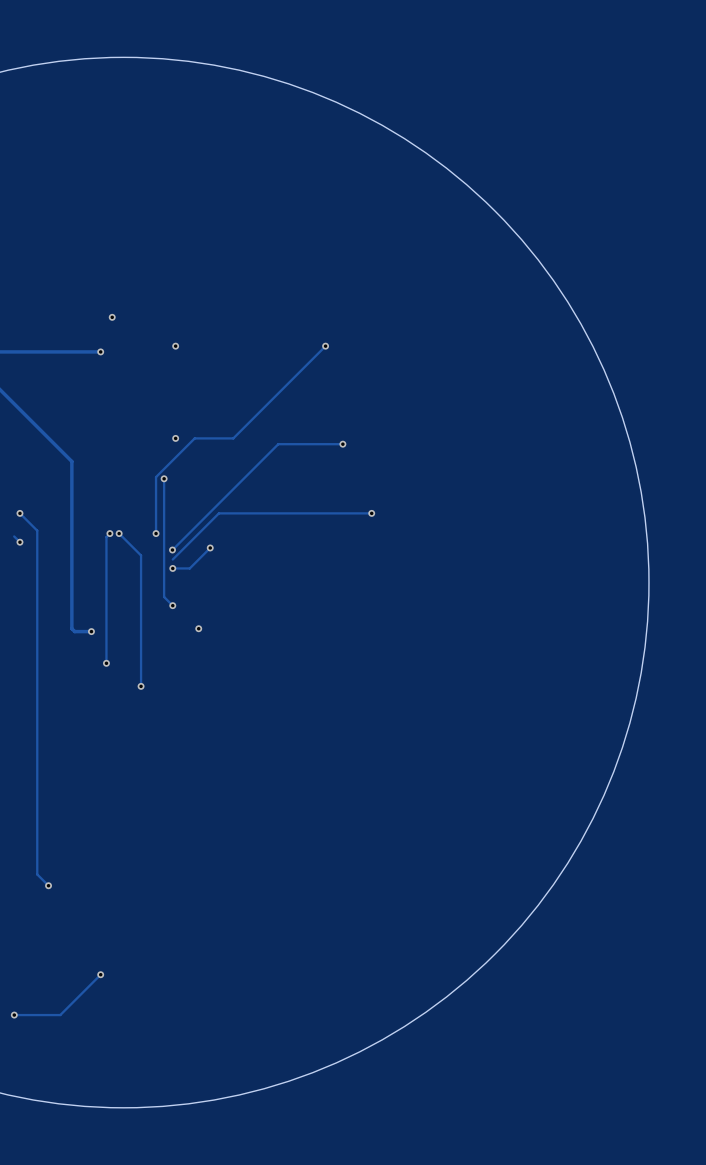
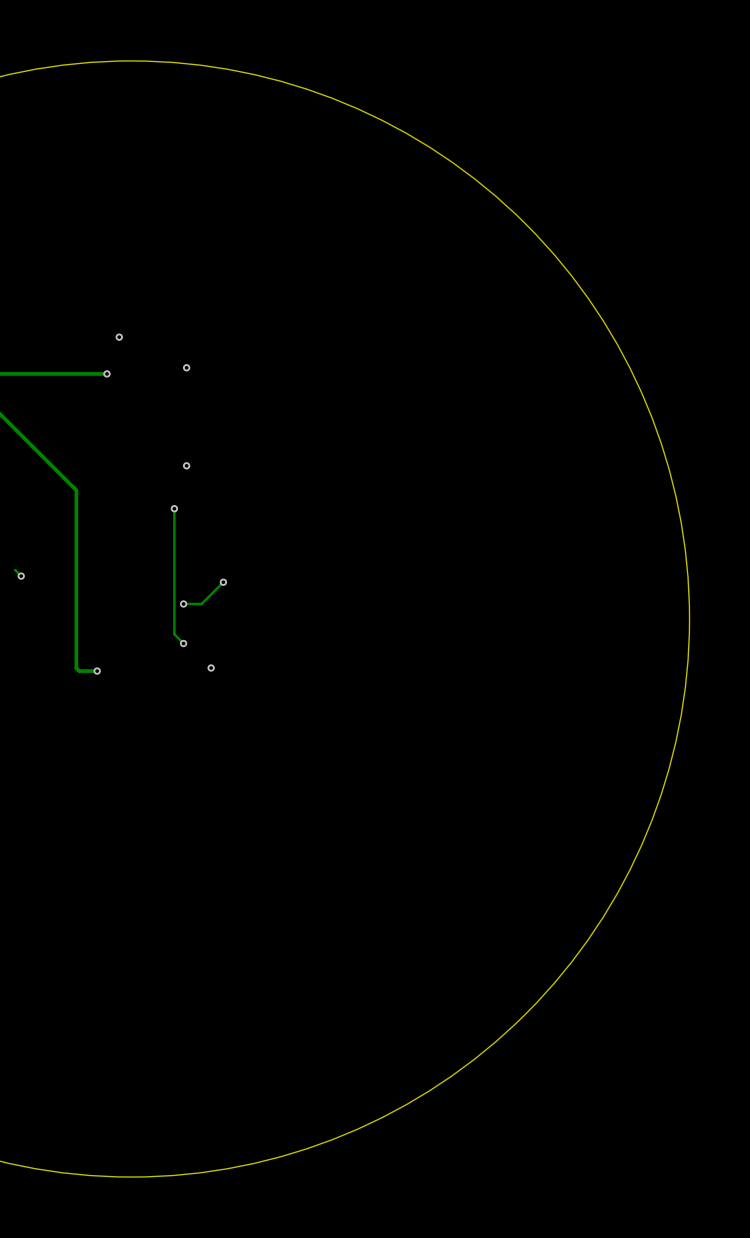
track: (325, 346) (233, 438) (194, 438) (156, 477) (156, 533) -> none
via: (325, 346) -> none
track: (342, 444) (278, 444) (172, 550) -> none
via: (342, 444) -> none
track: (19, 513) (37, 530) (37, 874) (48, 885) -> none
via: (19, 513) -> none
track: (371, 513) (218, 513) (172, 559) -> none
via: (371, 513) -> none
track: (109, 533) (106, 537) (106, 663) -> none
via: (109, 533) -> none
track: (119, 533) (141, 555) (141, 686) -> none
via: (119, 533) -> none
via: (156, 533) -> none
via: (172, 550) -> none
via: (106, 663) -> none
via: (141, 686) -> none
via: (48, 885) -> none
track: (100, 974) (60, 1015) (14, 1015) -> none
via: (100, 974) -> none
via: (14, 1015) -> none

